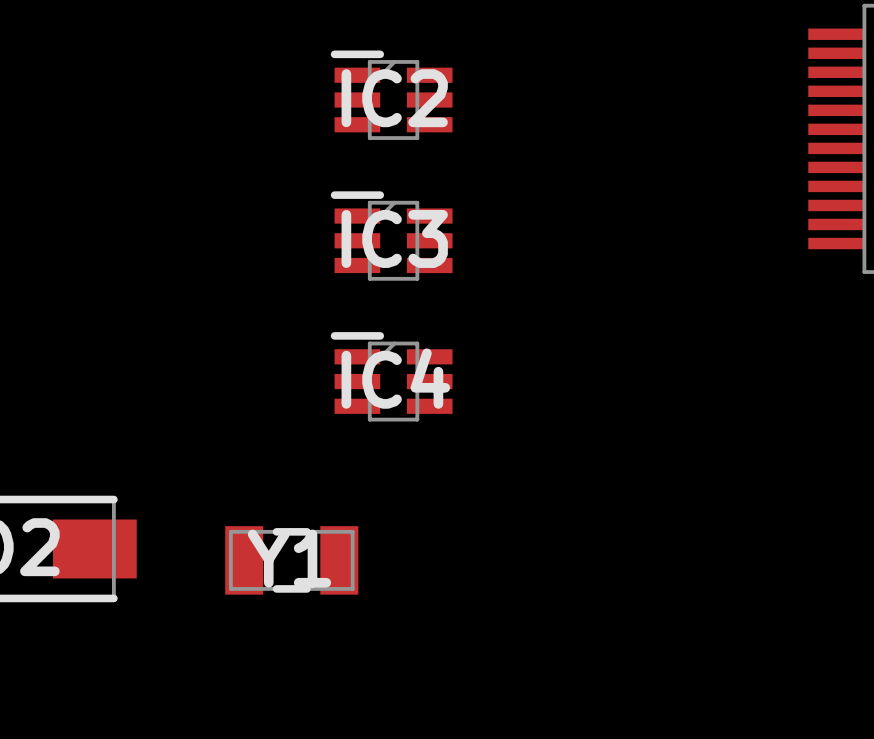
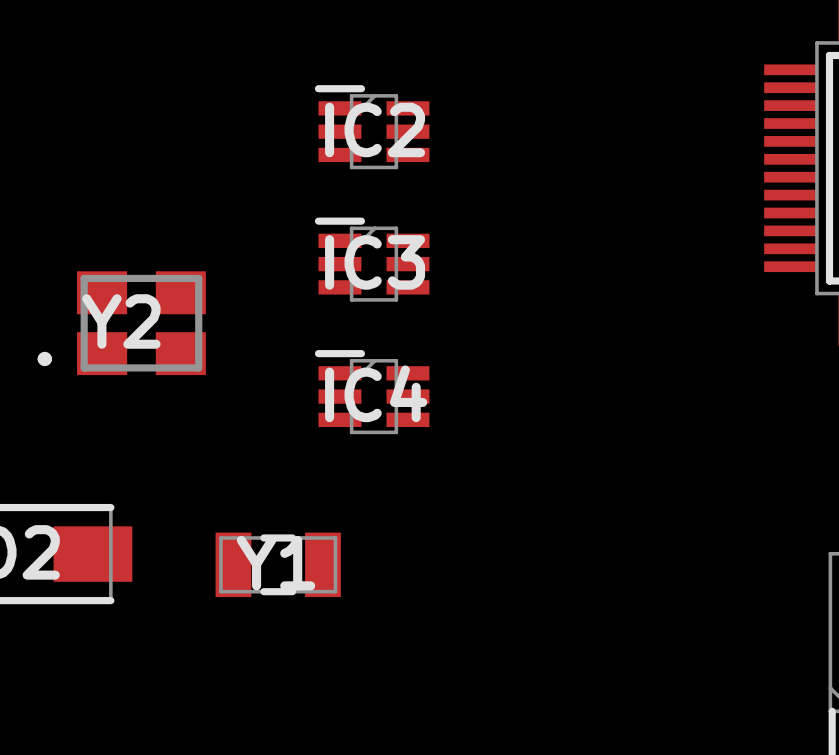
Y2: none -> (121, 323)

